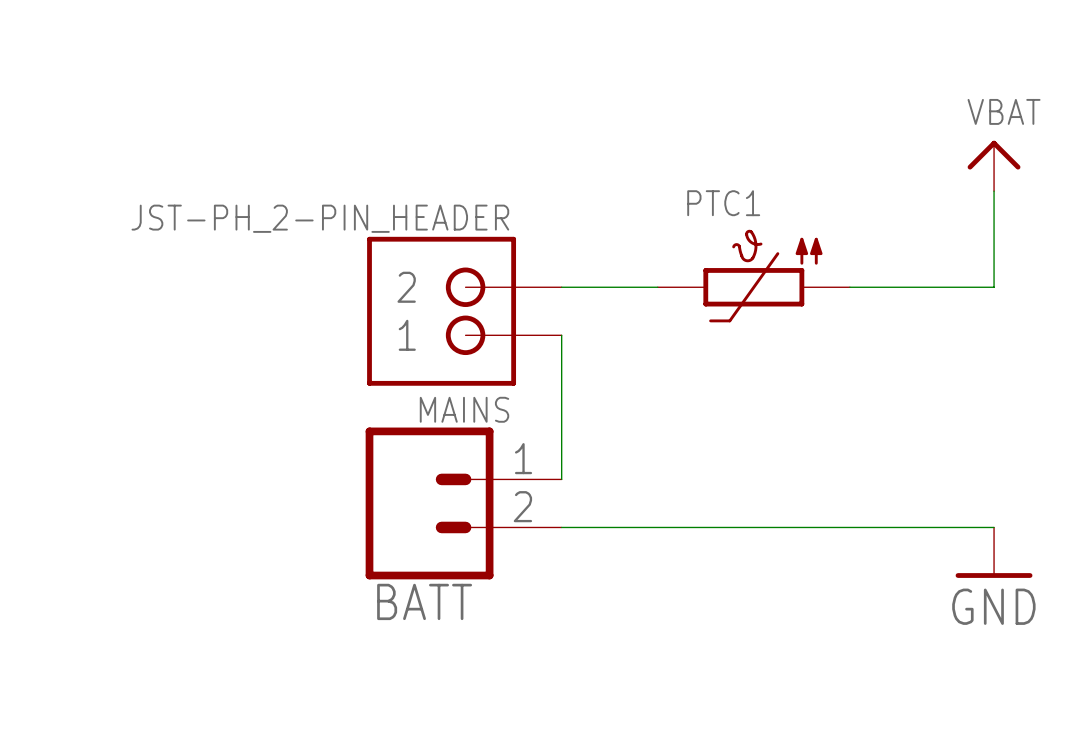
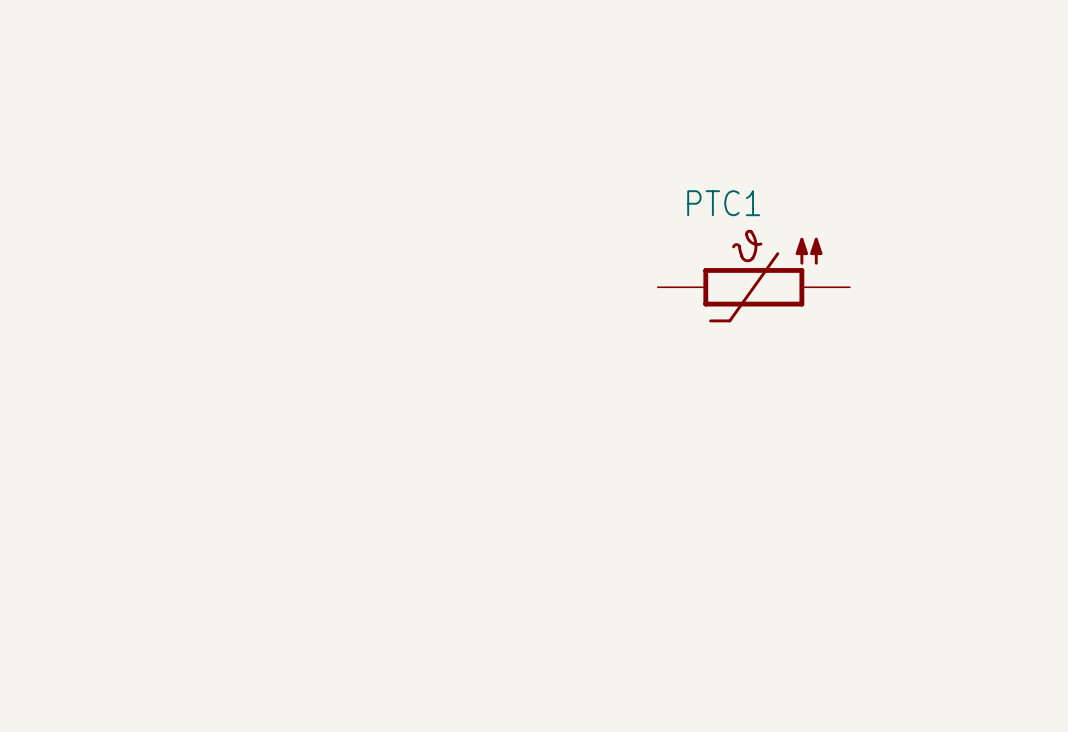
power symbol: VBAT (994, 165) -> none
wire: (994, 191) (994, 287) (849, 287) -> none
wire: (561, 287) (657, 287) -> none
MAINS: JST-PH_2-PIN_HEADER (464, 311) -> none
wire: (561, 335) (561, 479) -> none
BATT: (463, 503) -> none
wire: (561, 527) (994, 527) -> none
power symbol: GND (994, 552) -> none

